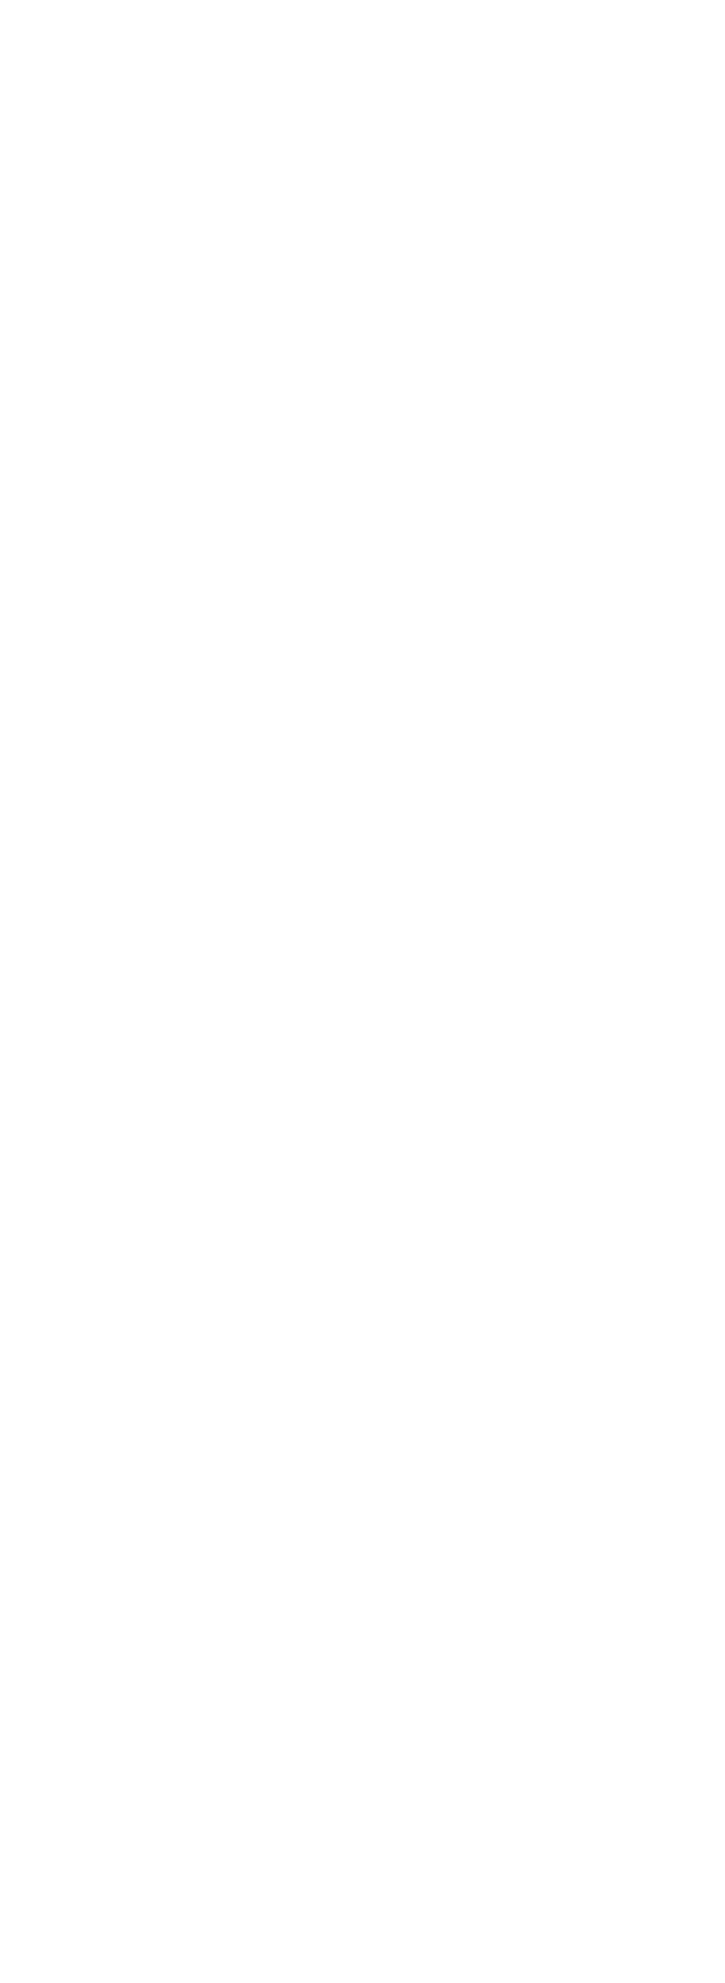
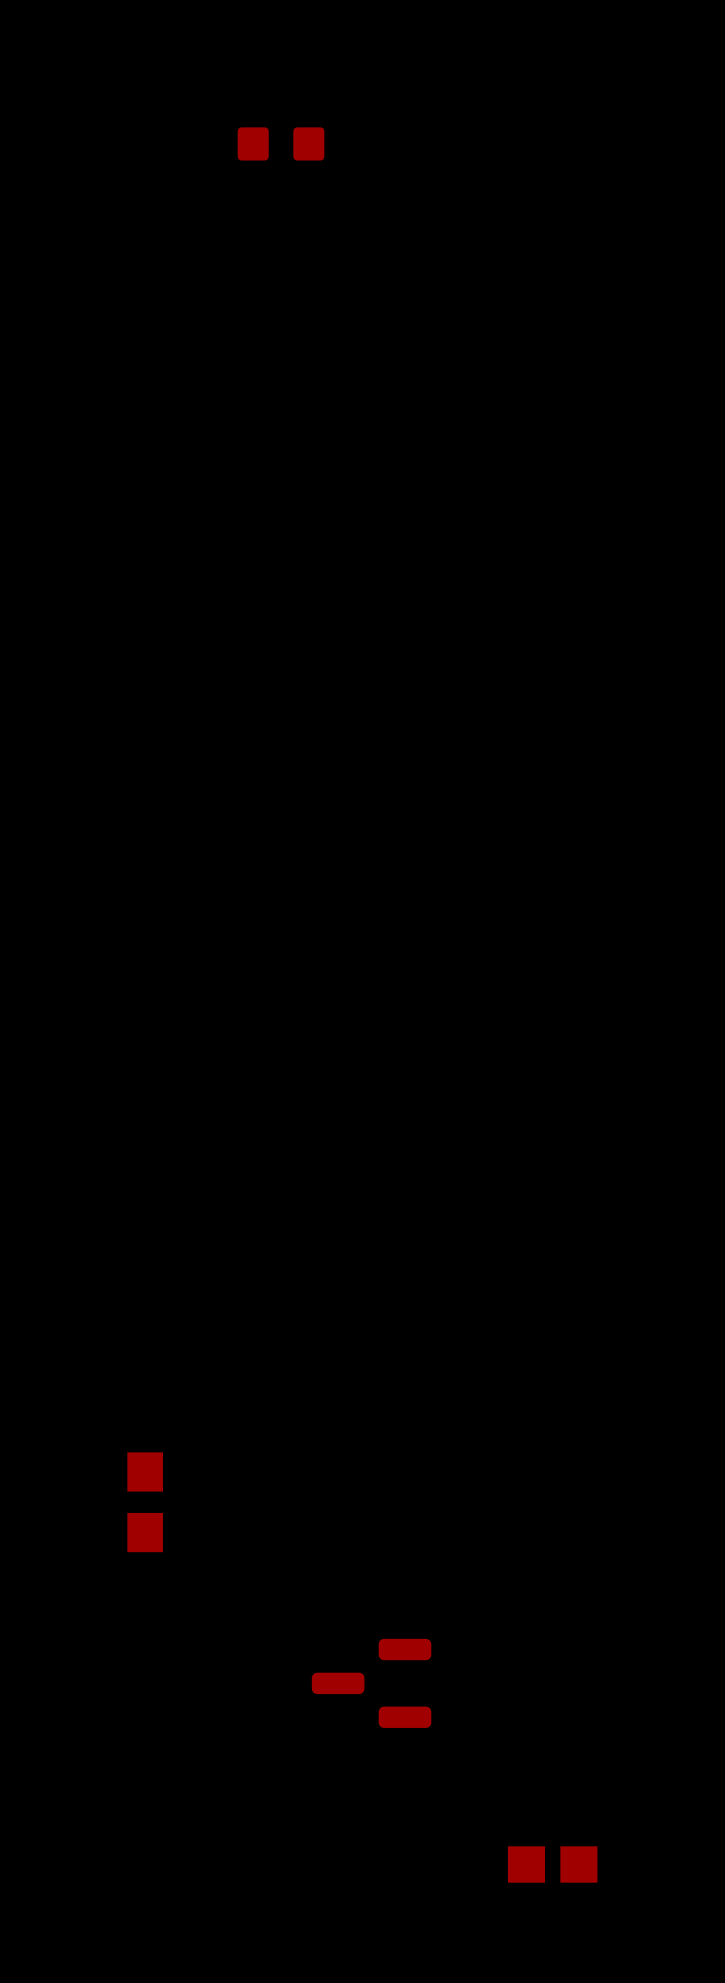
part: none -> (281, 143)
part: none -> (145, 1502)
part: none -> (371, 1683)
part: none -> (552, 1864)

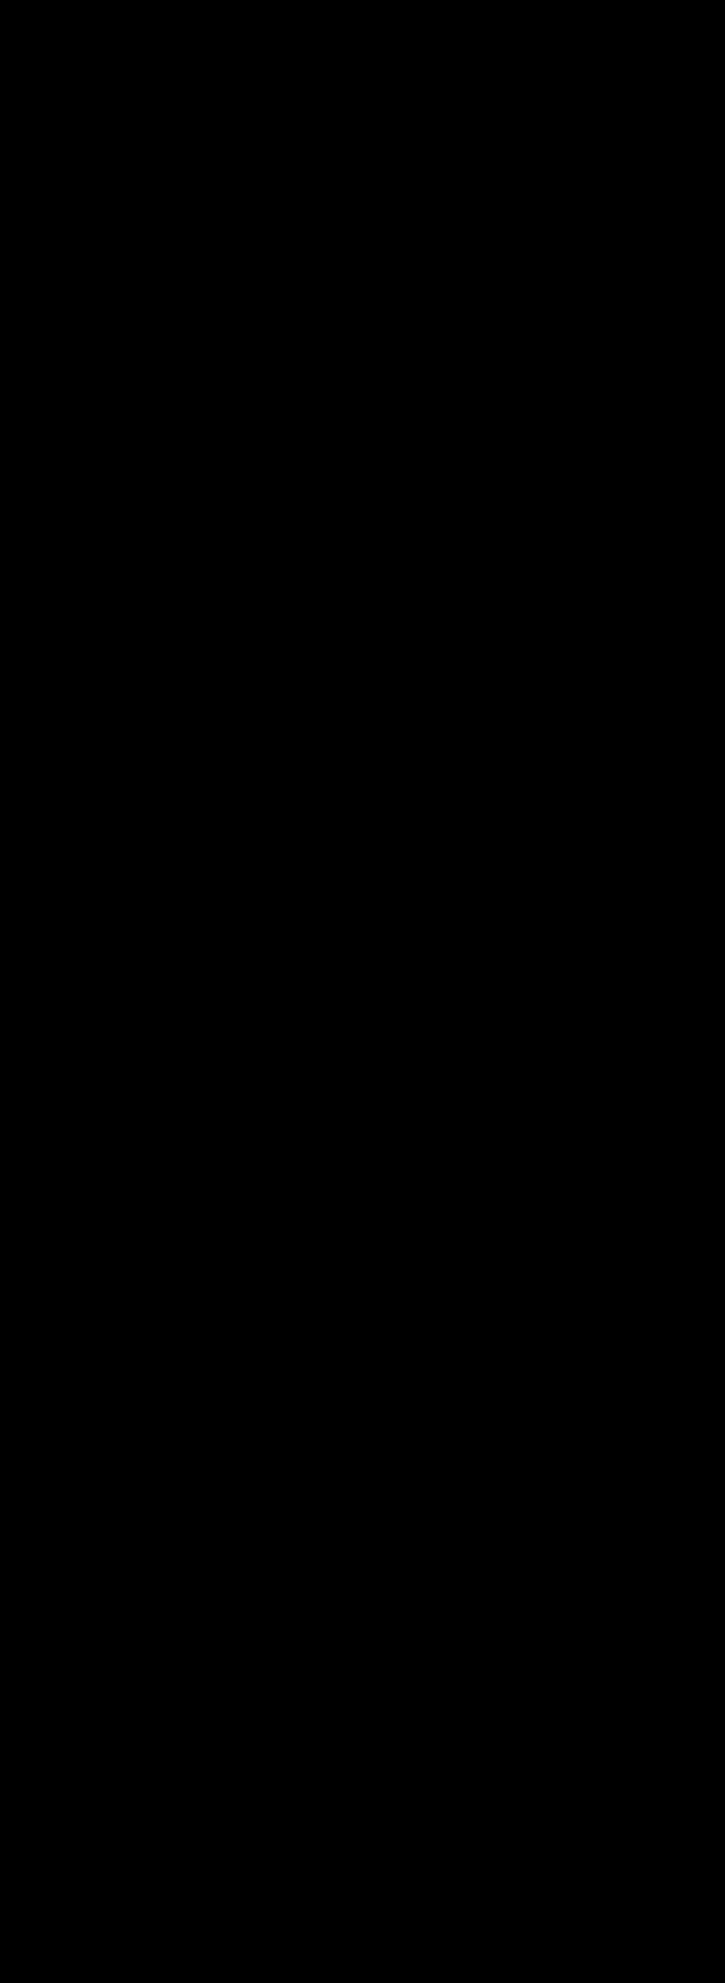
part: (281, 143) -> none
part: (145, 1502) -> none
part: (371, 1683) -> none
part: (552, 1864) -> none

